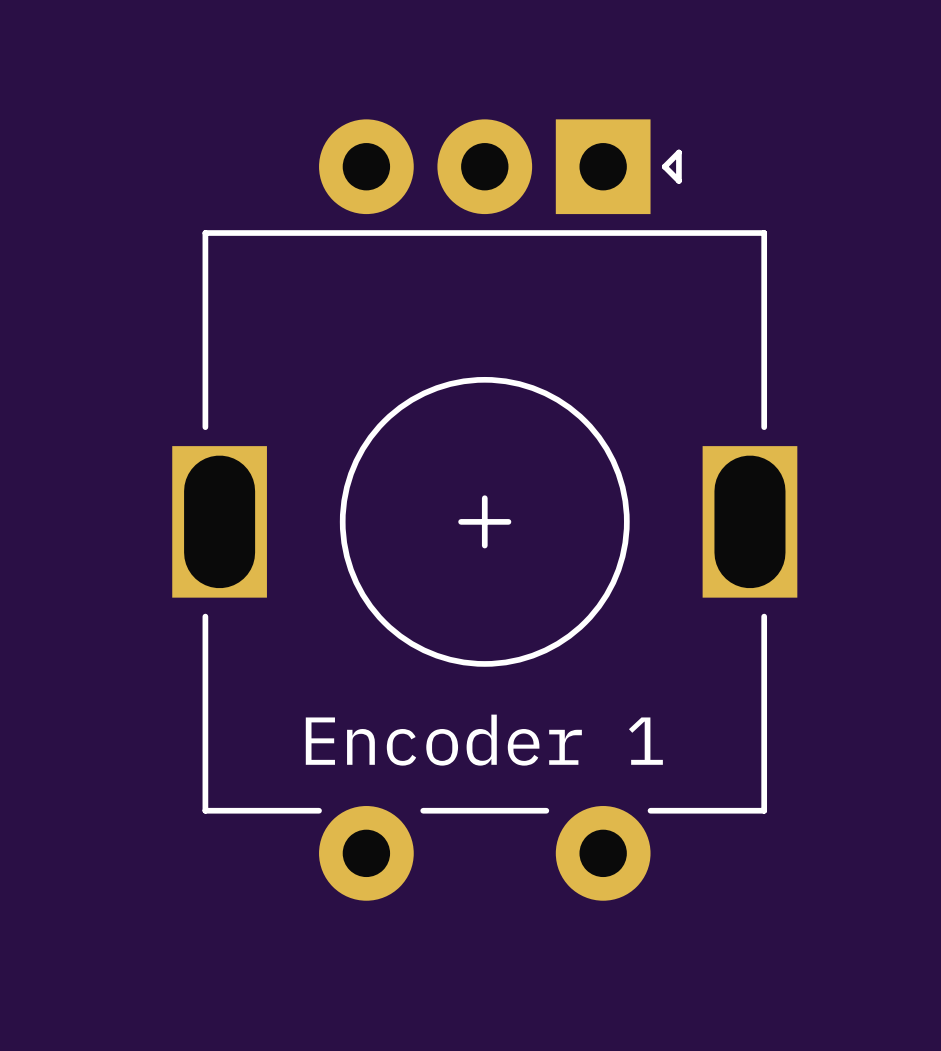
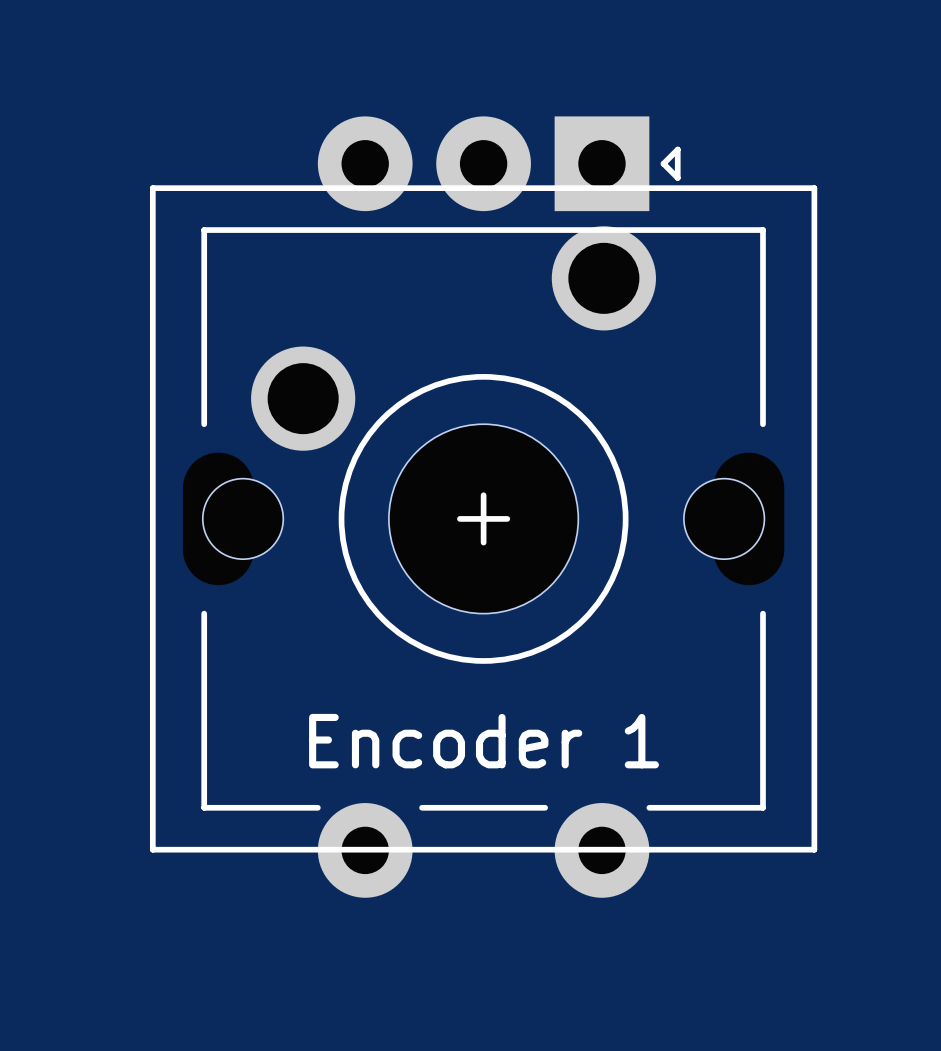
part footprint: [172, 119, 798, 901] -> [182, 116, 785, 898]
part: none -> (483, 518)

